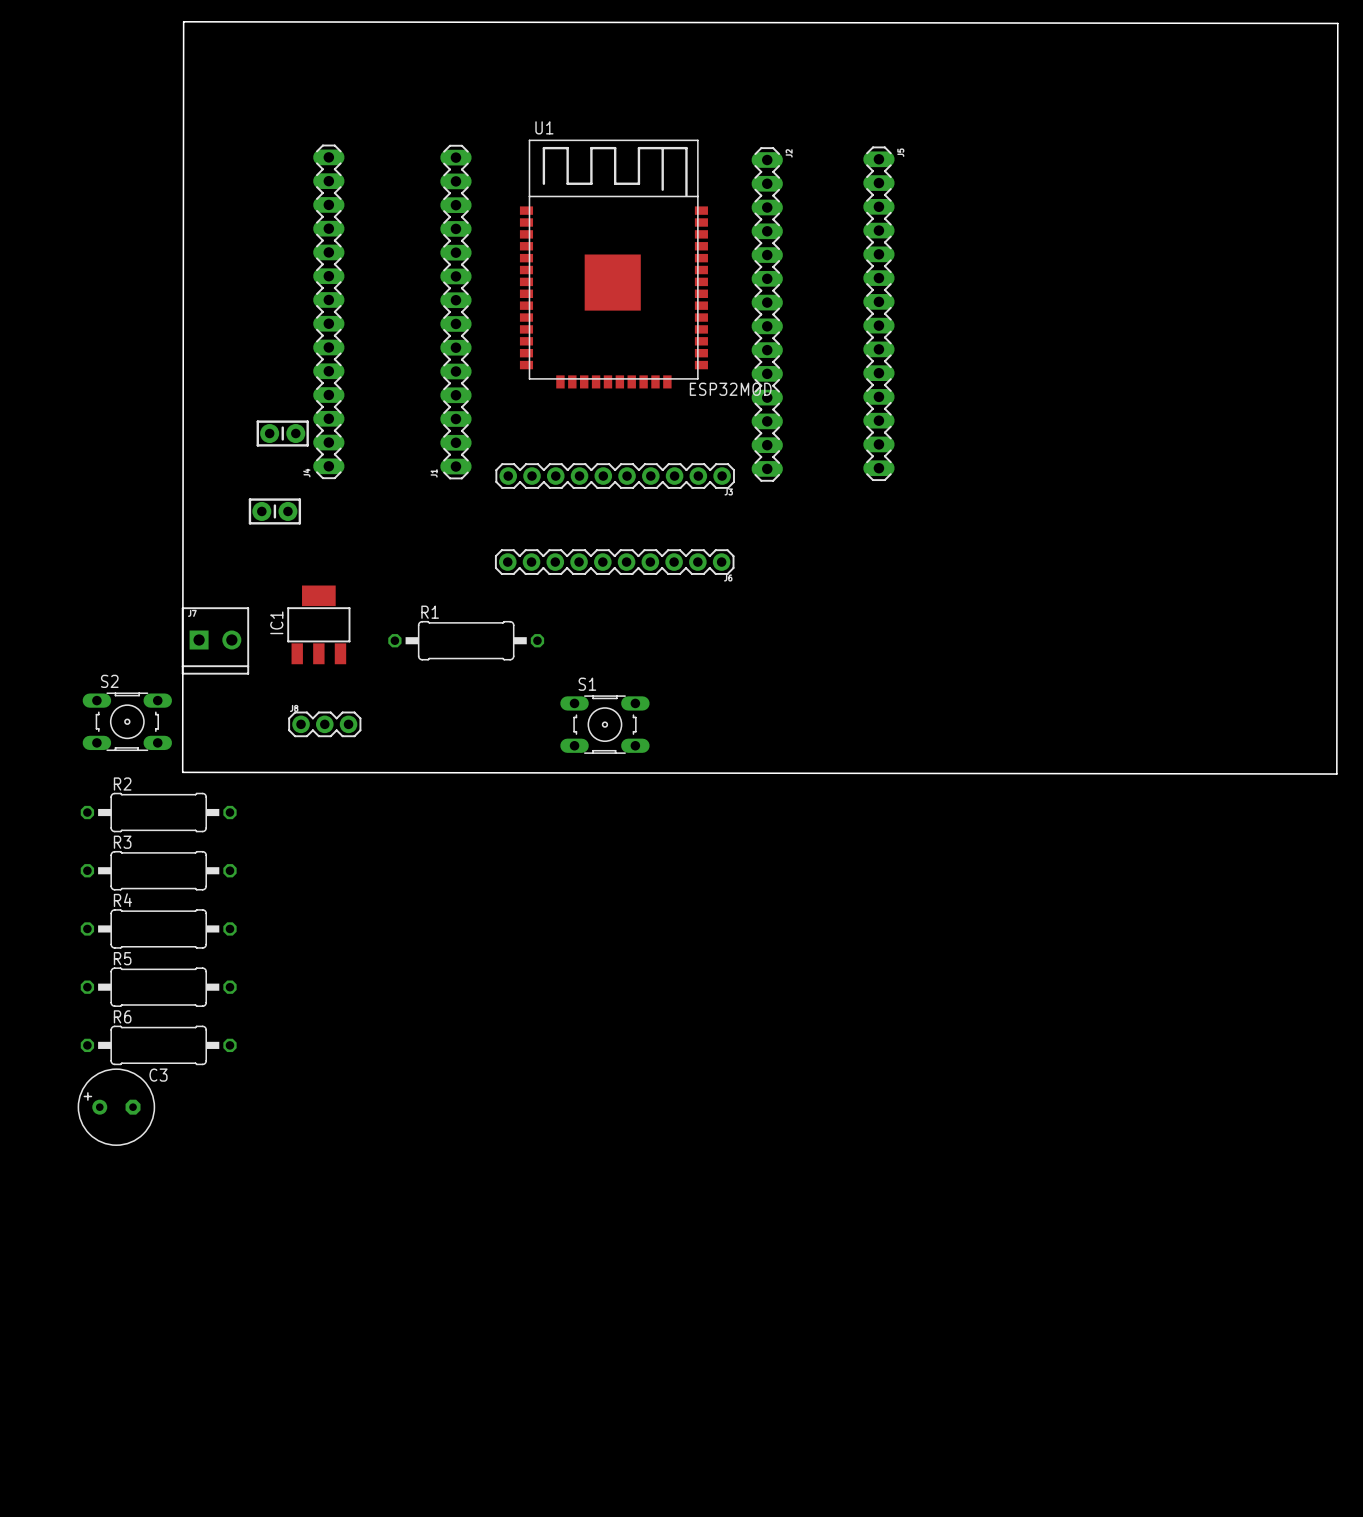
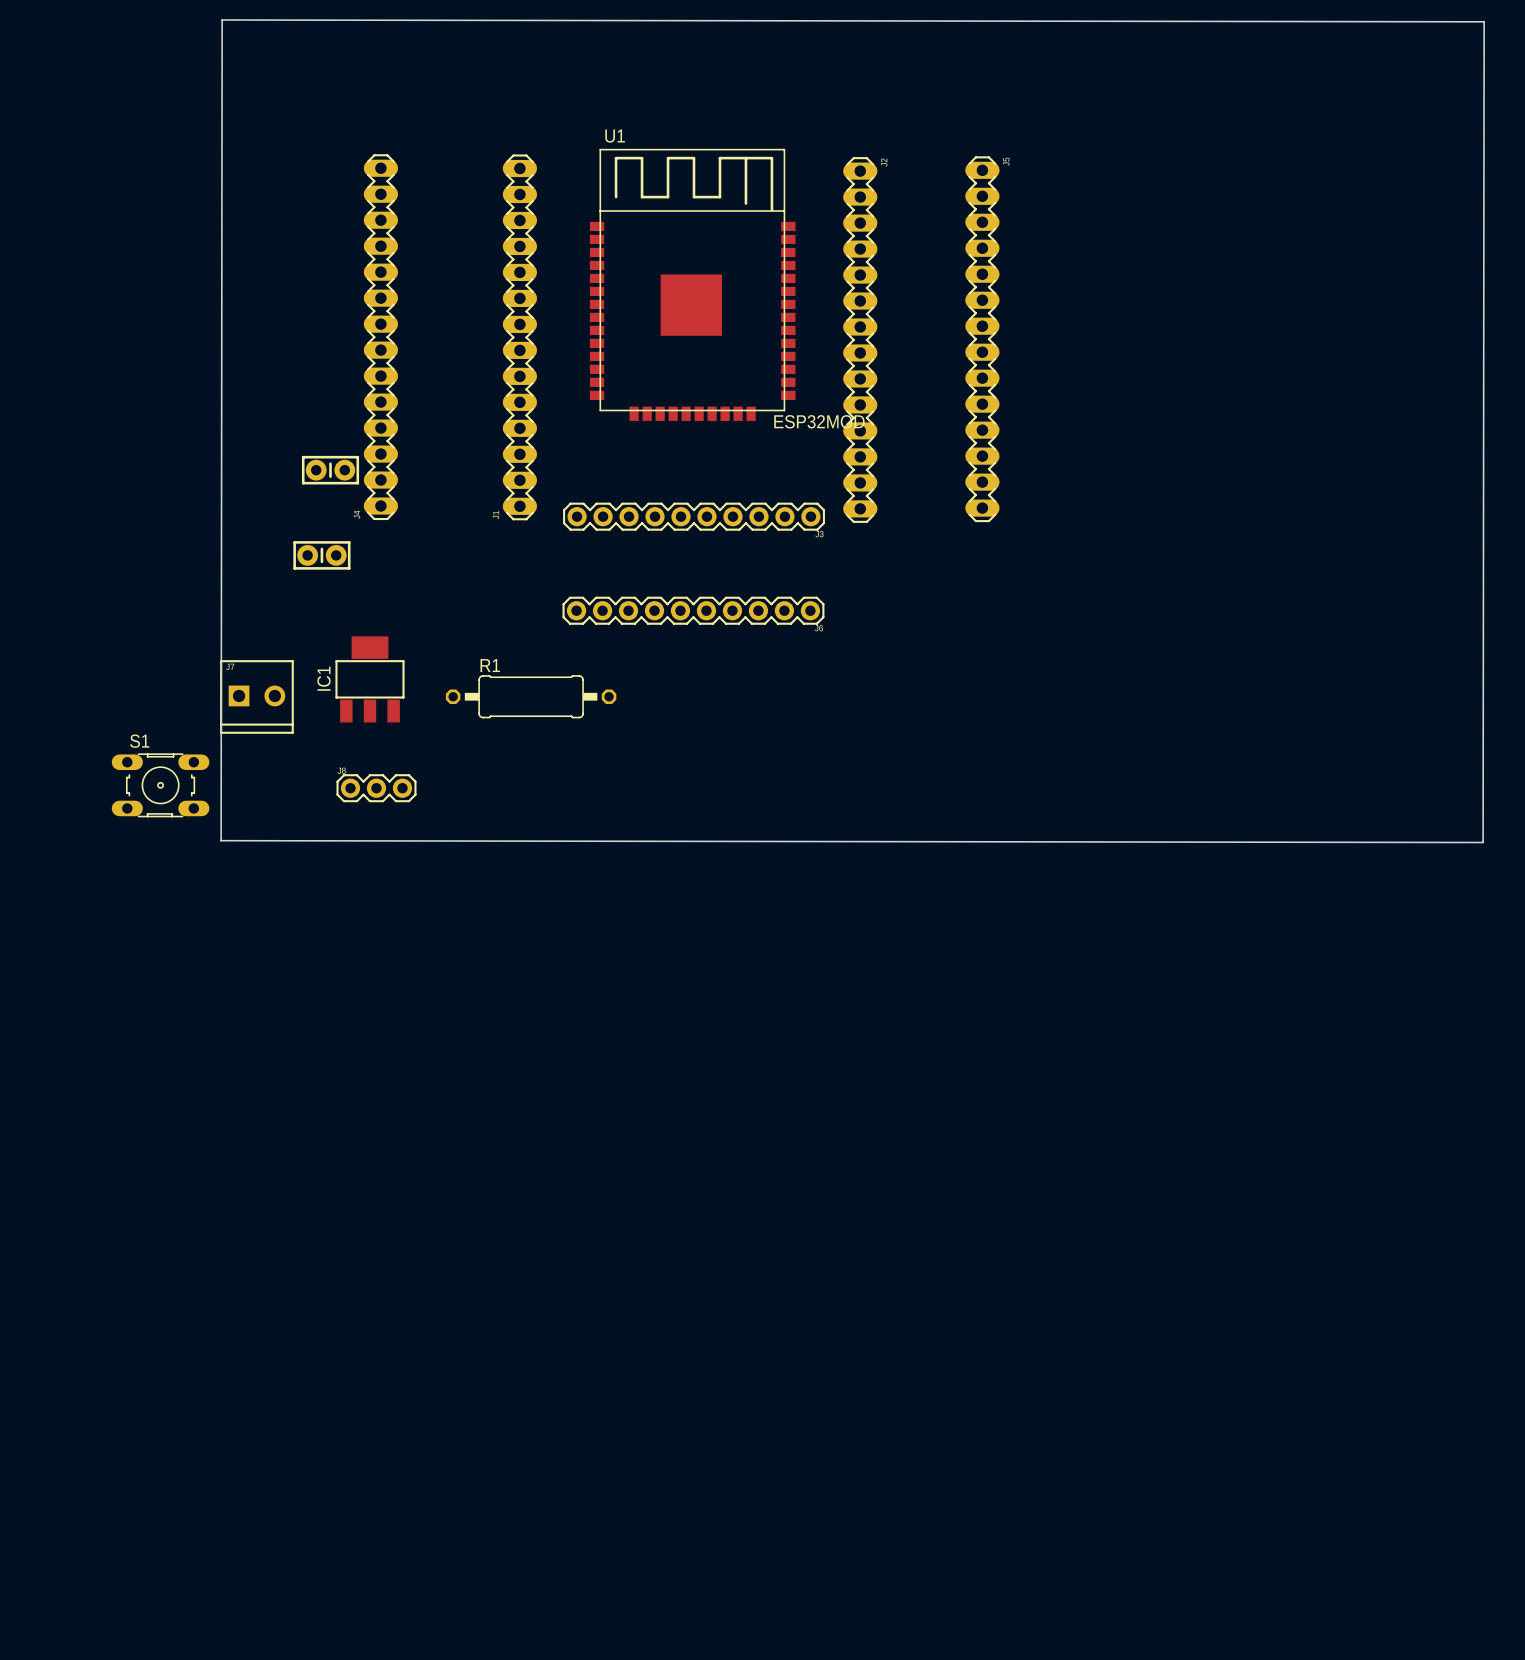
S2 name: S2 (109, 681) -> S1 (139, 741)
S1: (604, 724) -> none
R2: (158, 812) -> none
R3: (158, 870) -> none
R4: (158, 928) -> none
R5: (158, 987) -> none
R6: (158, 1045) -> none
C3: (116, 1107) -> none

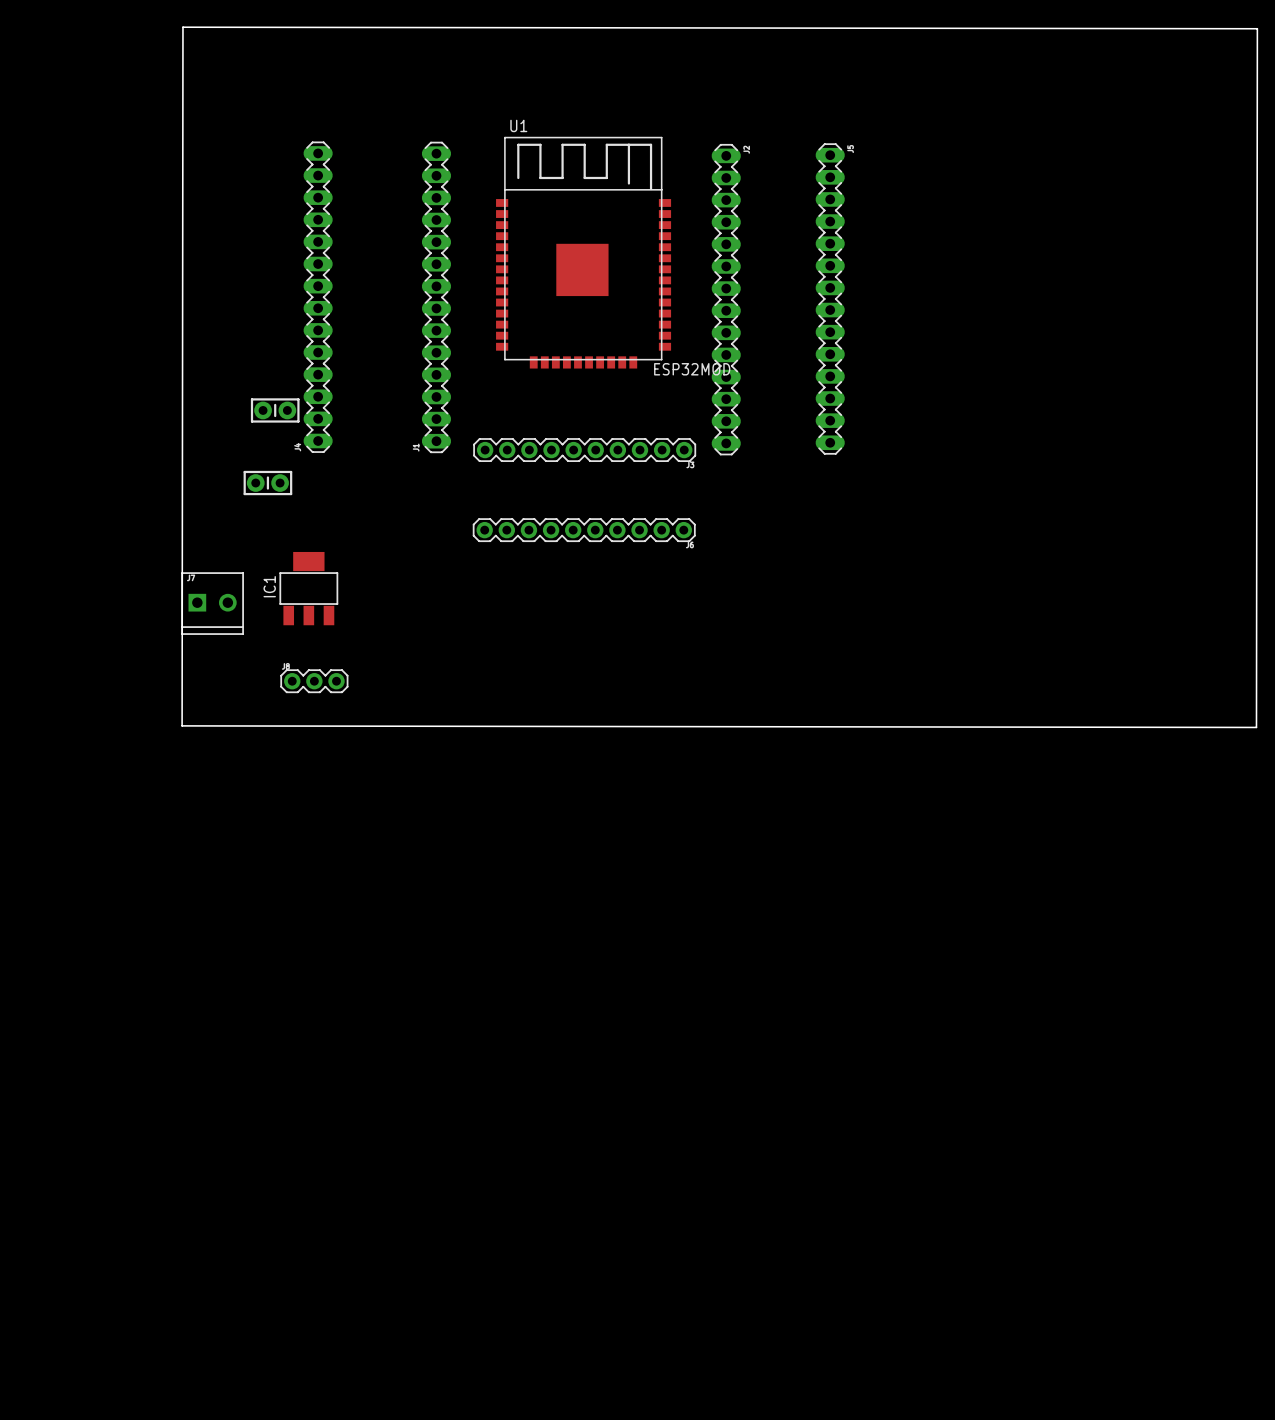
R1: (531, 696) -> none
S1: (160, 785) -> none

